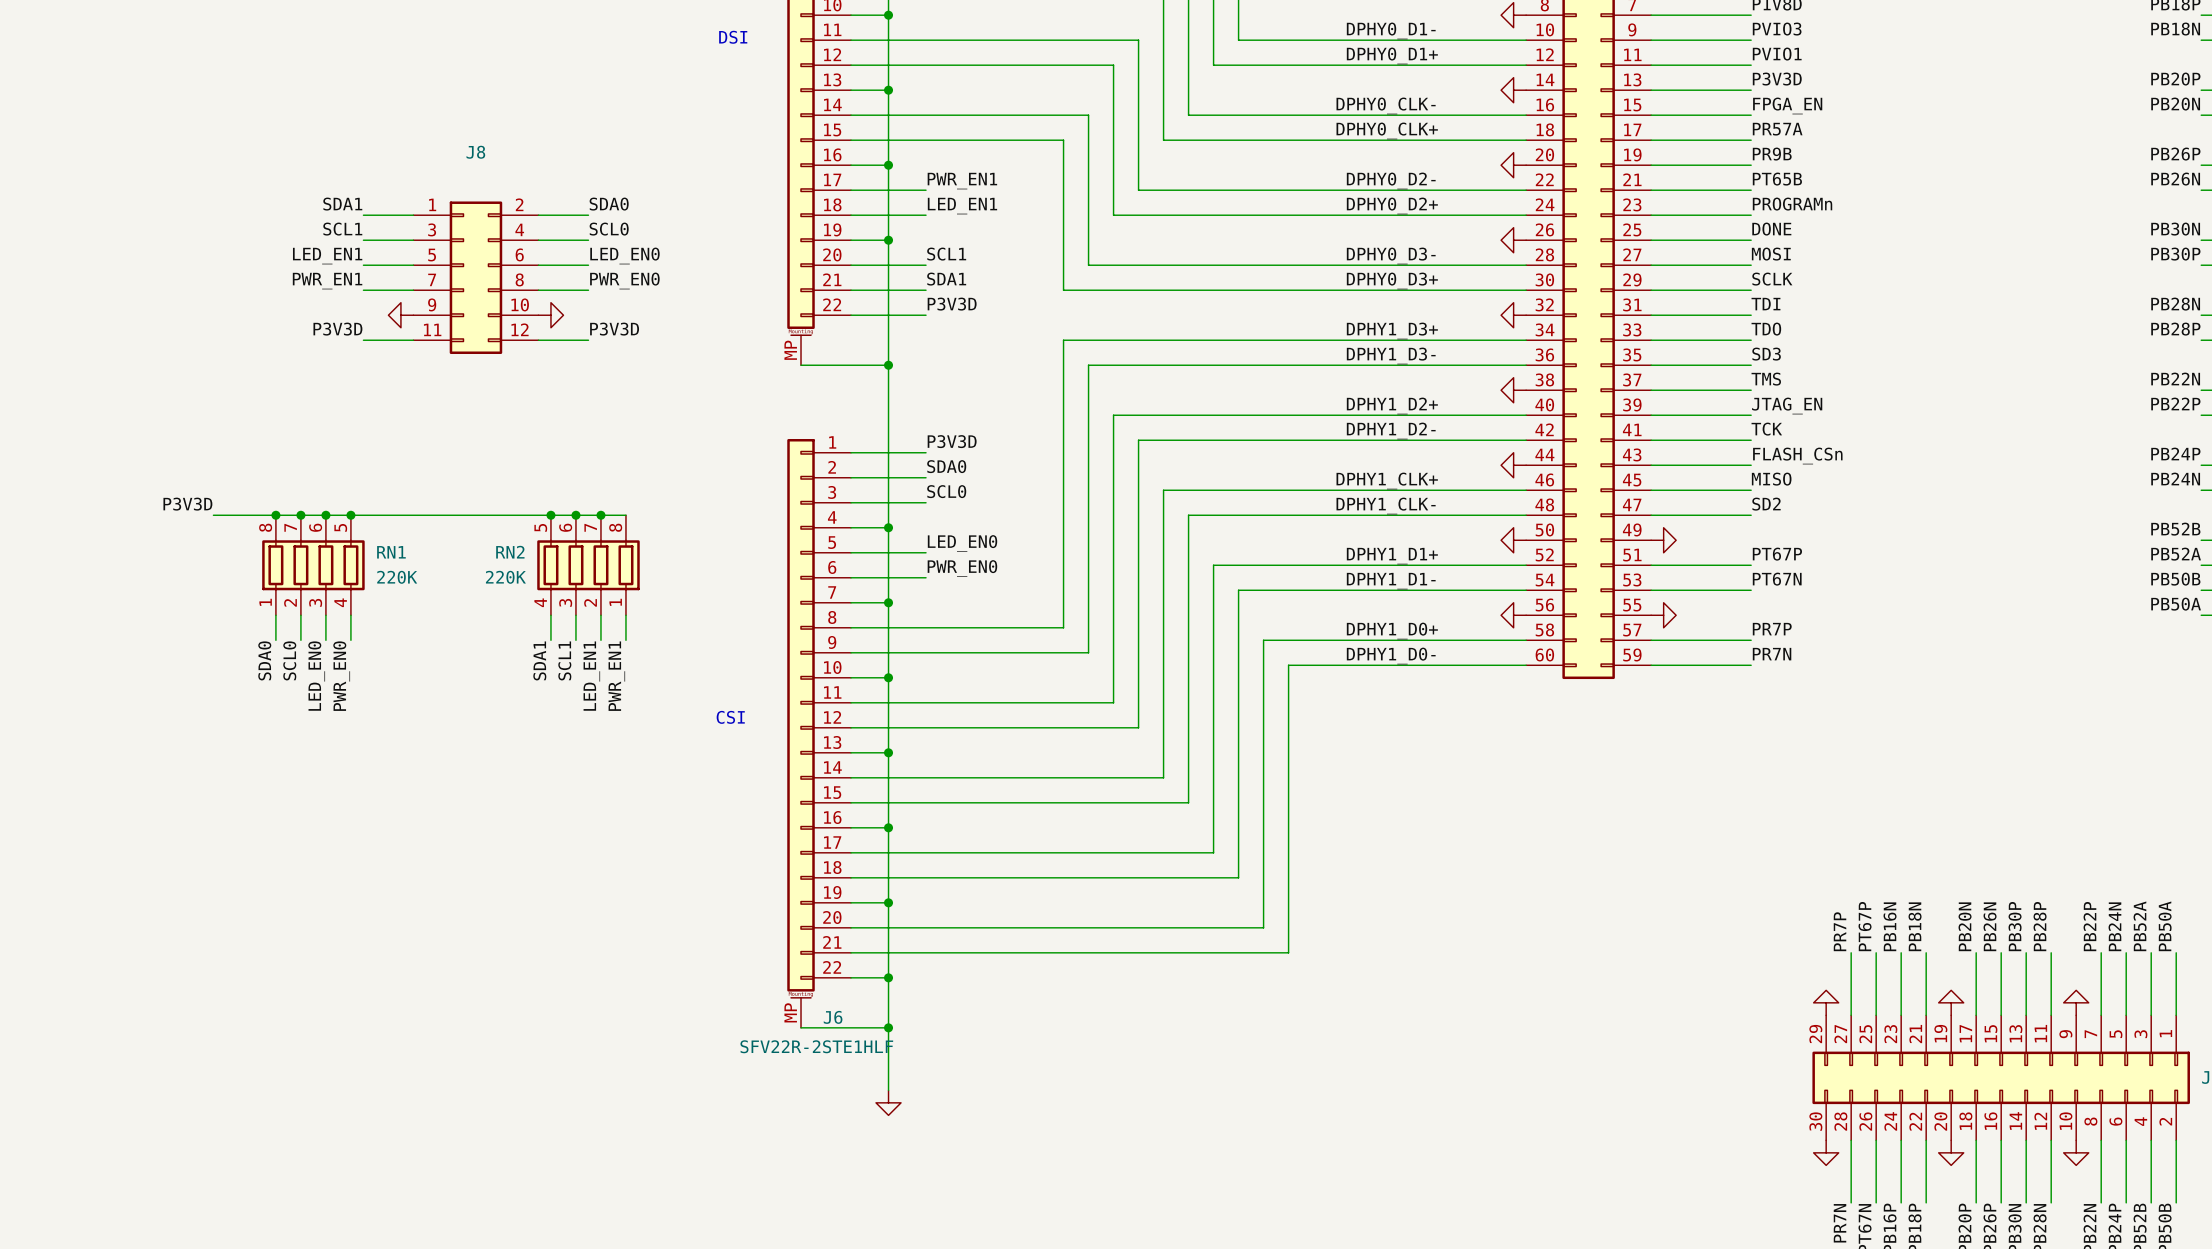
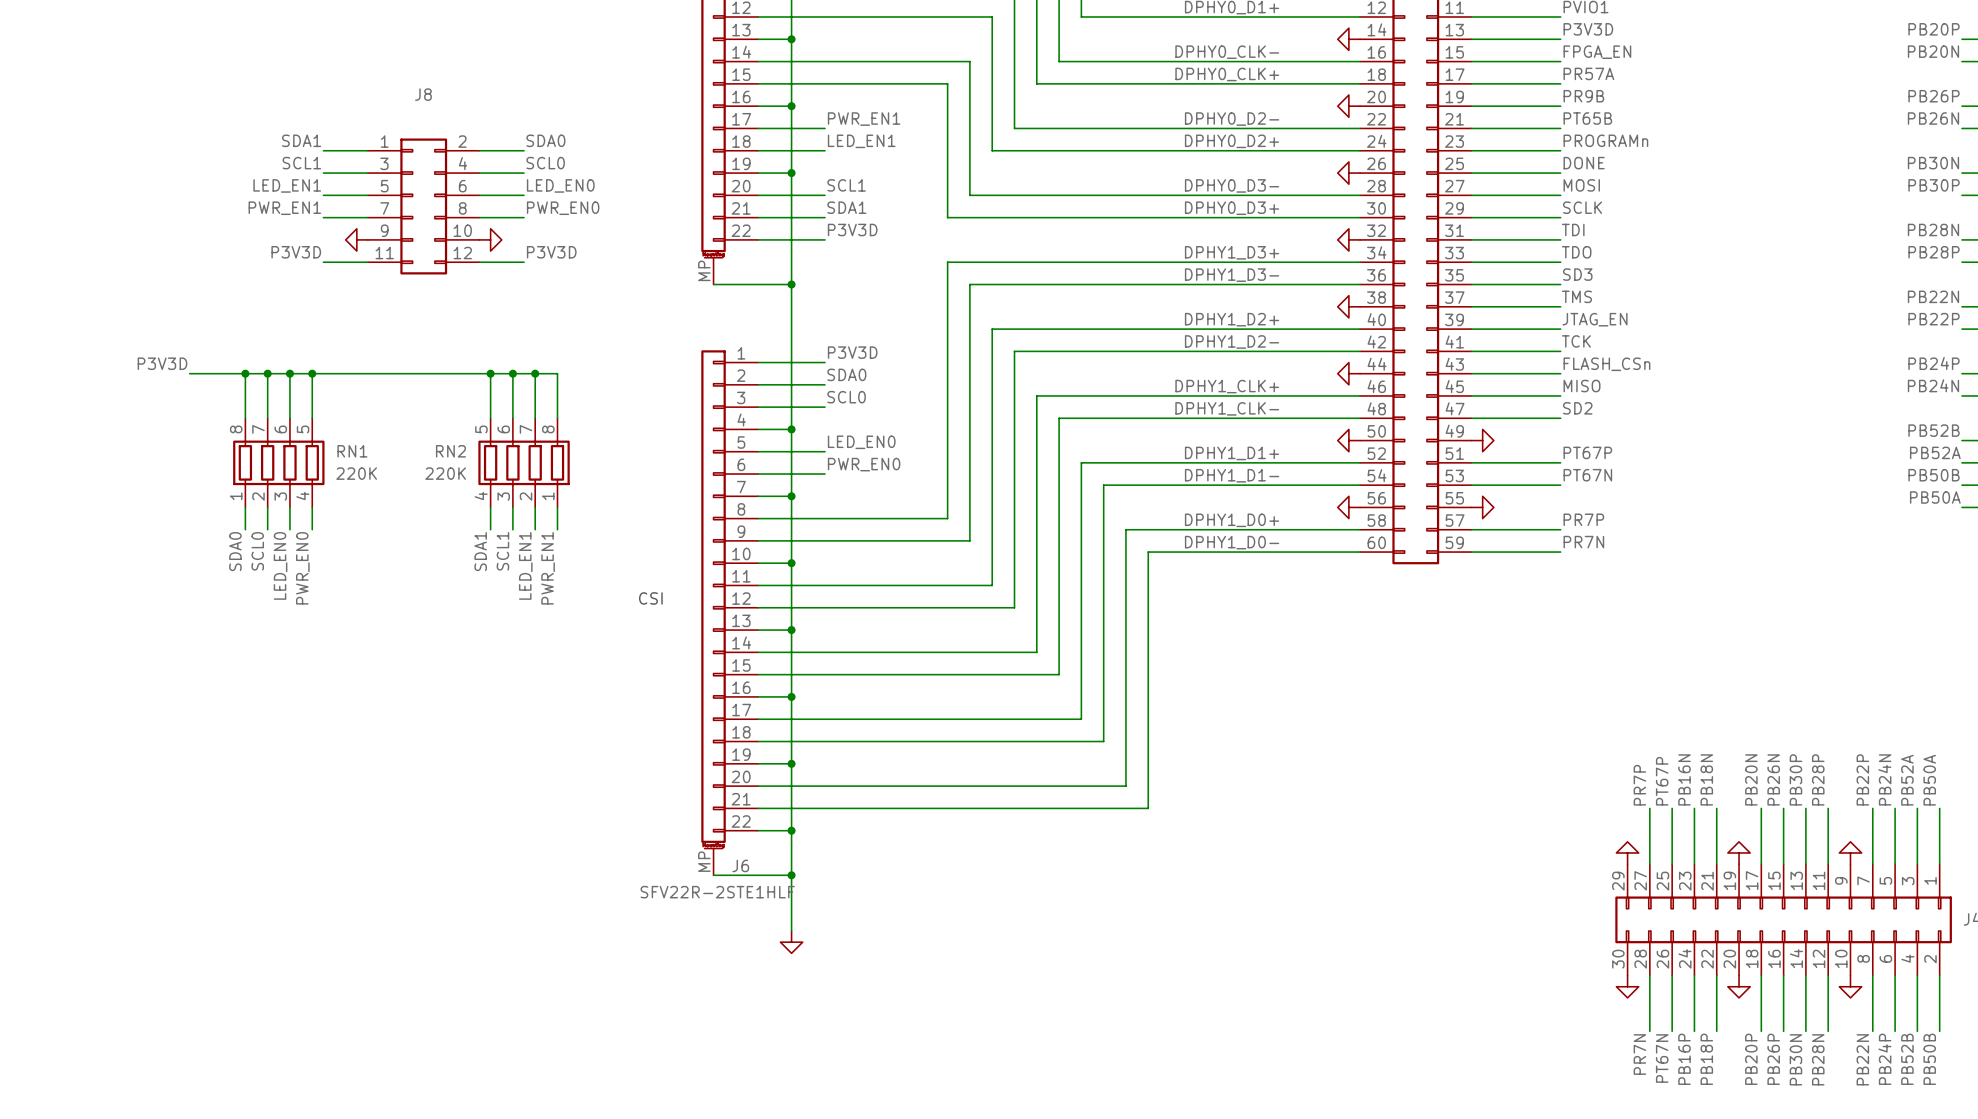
wire: none -> (245, 373) (245, 418)
junction: none -> (245, 373)
wire: none -> (267, 373) (267, 418)
junction: none -> (267, 373)
wire: none -> (289, 373) (289, 418)
junction: none -> (289, 373)
wire: none -> (312, 373) (312, 418)
junction: none -> (312, 373)
wire: none -> (490, 373) (490, 418)
junction: none -> (490, 373)
wire: none -> (512, 373) (512, 418)
junction: none -> (512, 373)
wire: none -> (535, 373) (535, 418)
junction: none -> (535, 373)
label position: P3V3D (187, 504) -> P3V3D (162, 363)
wire: (213, 515) (625, 515) -> (189, 373) (557, 373) (557, 418)
junction: (275, 515) -> none
junction: (300, 515) -> none
junction: (325, 515) -> none
junction: (350, 515) -> none
junction: (550, 515) -> none
junction: (575, 515) -> none
junction: (600, 515) -> none

